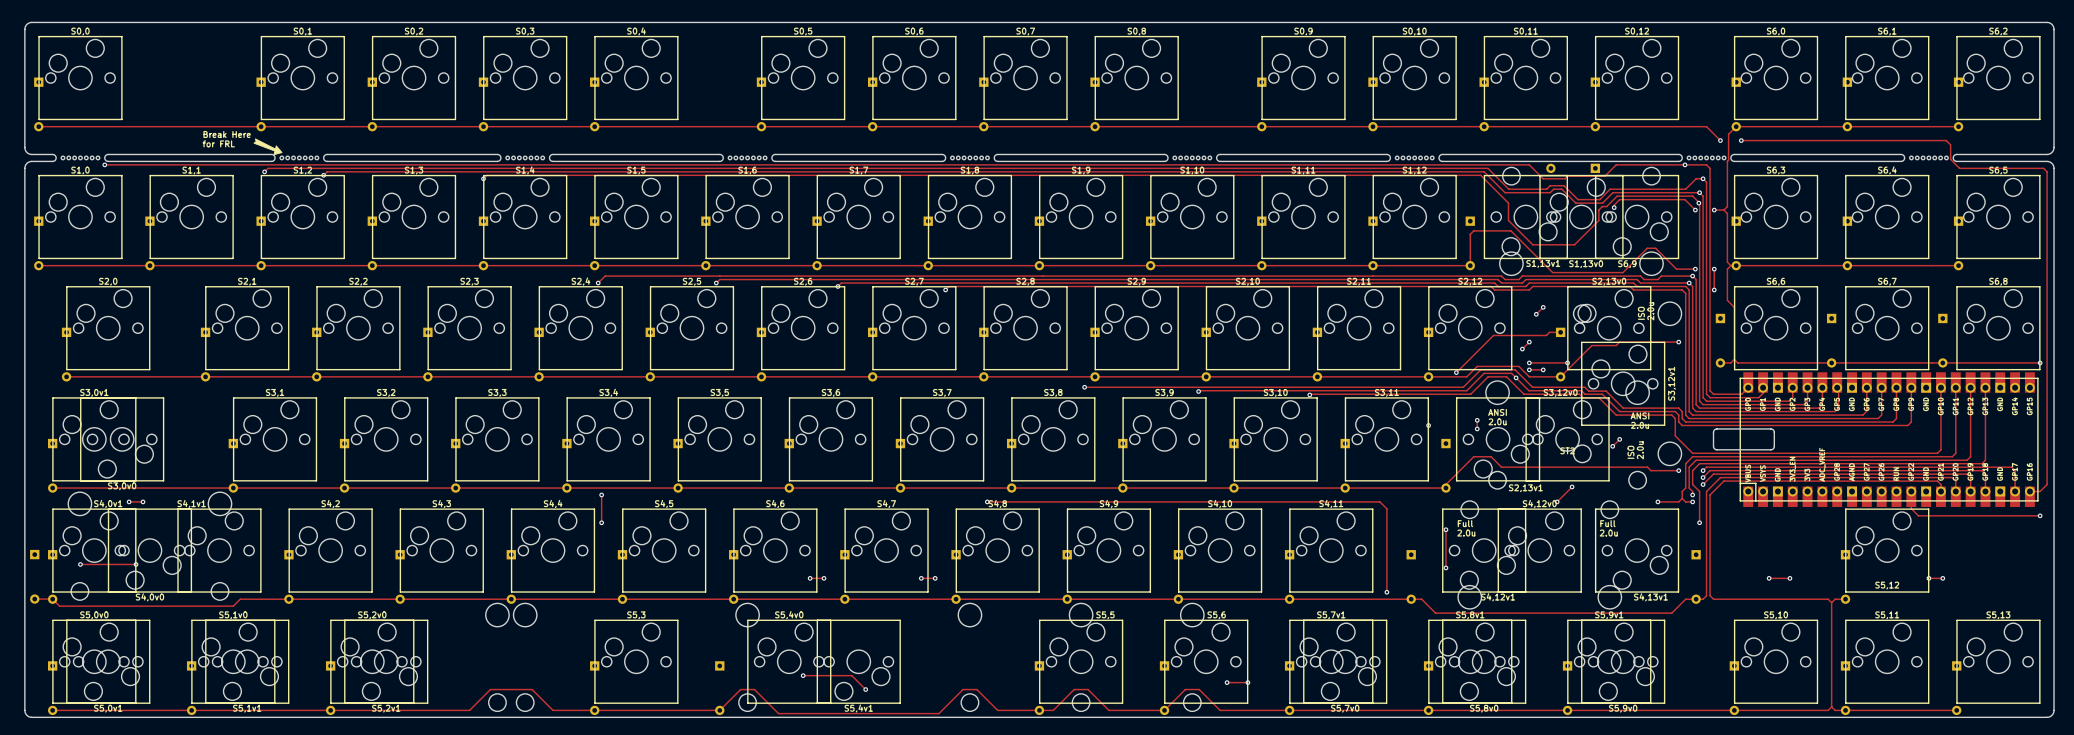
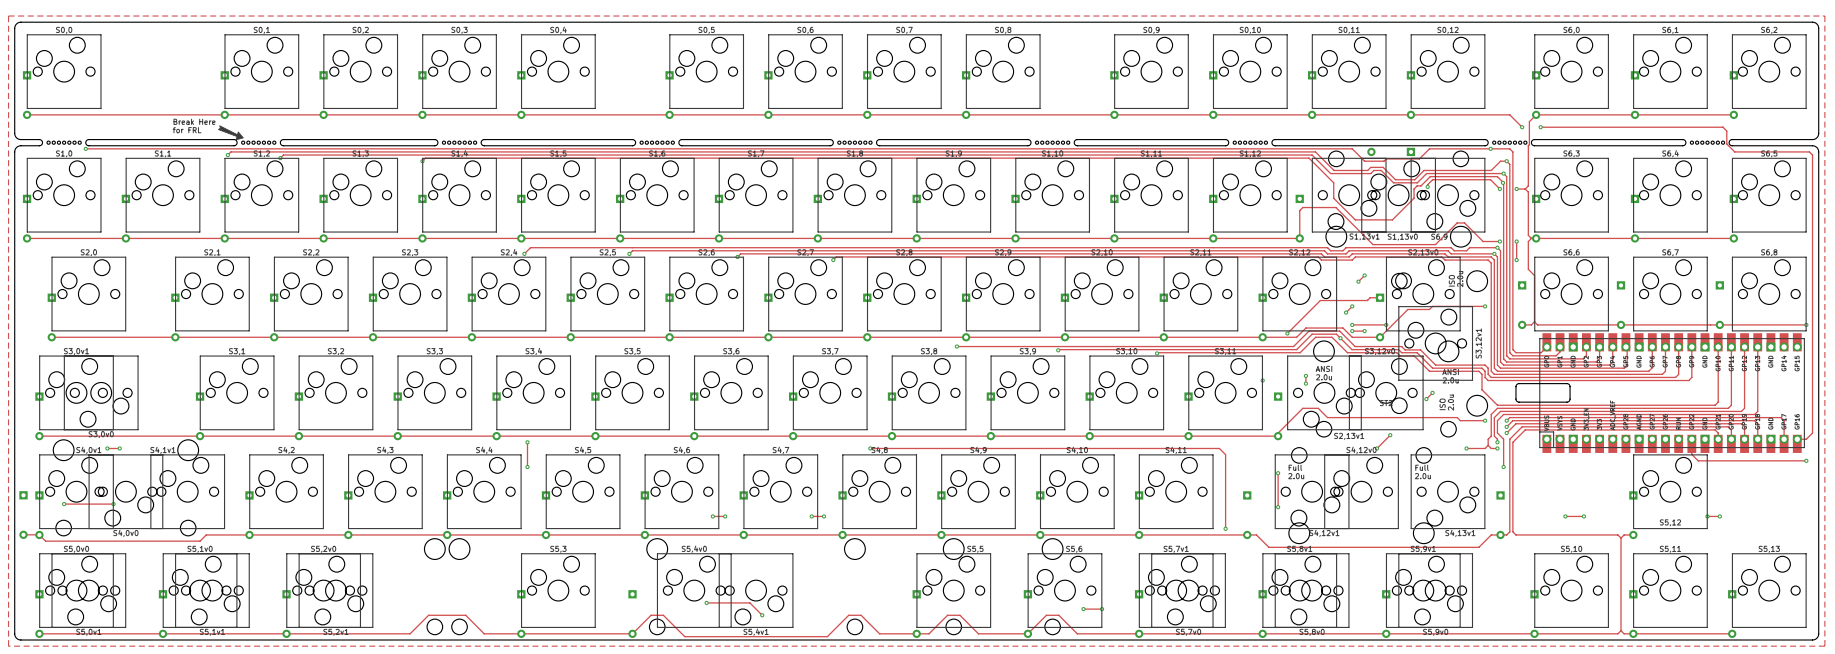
zone outline: none -> (8, 16) (1824, 16) (1824, 646) (8, 646) (8, 16)

